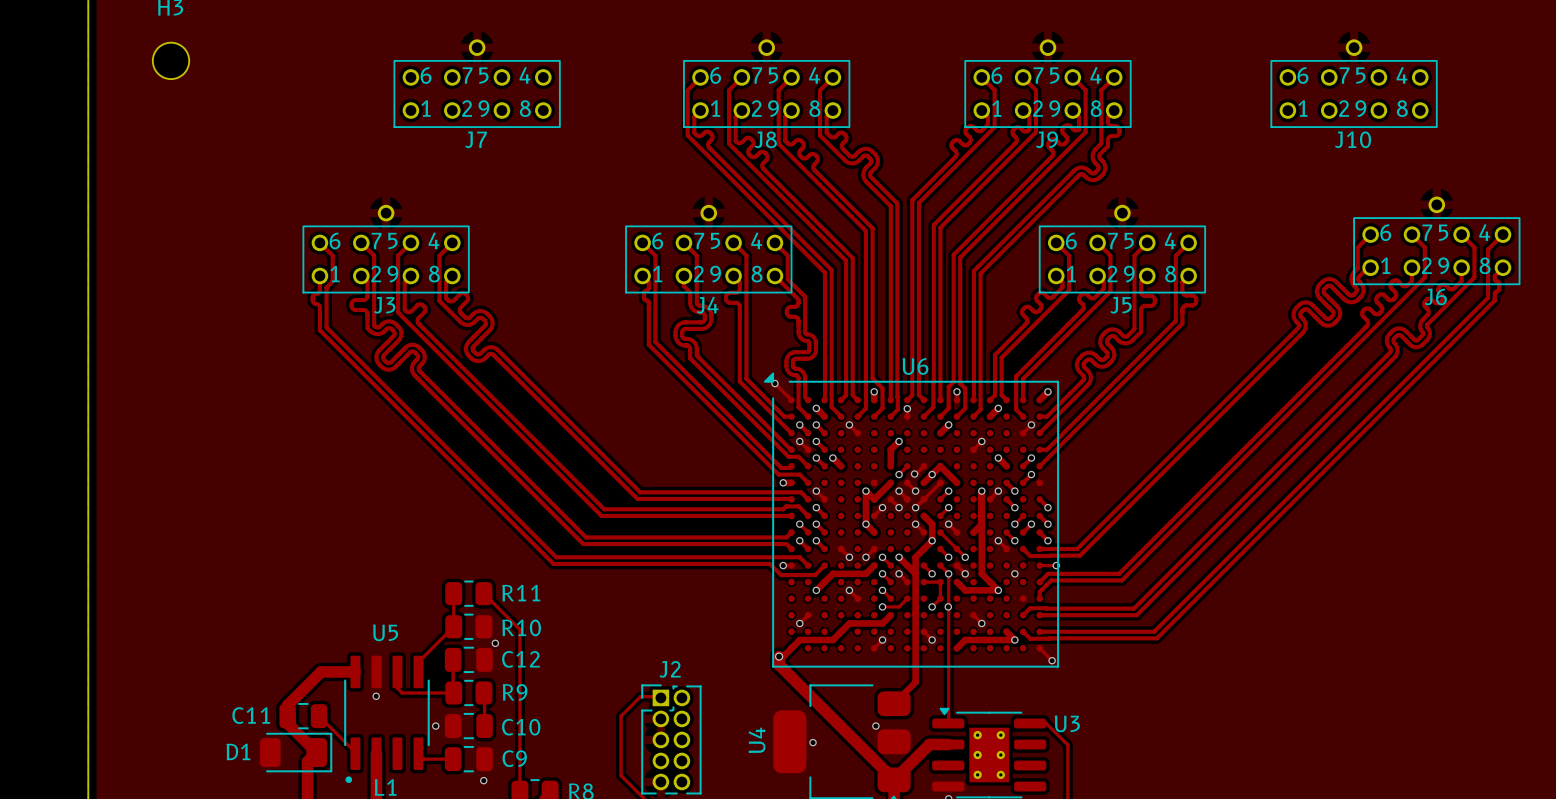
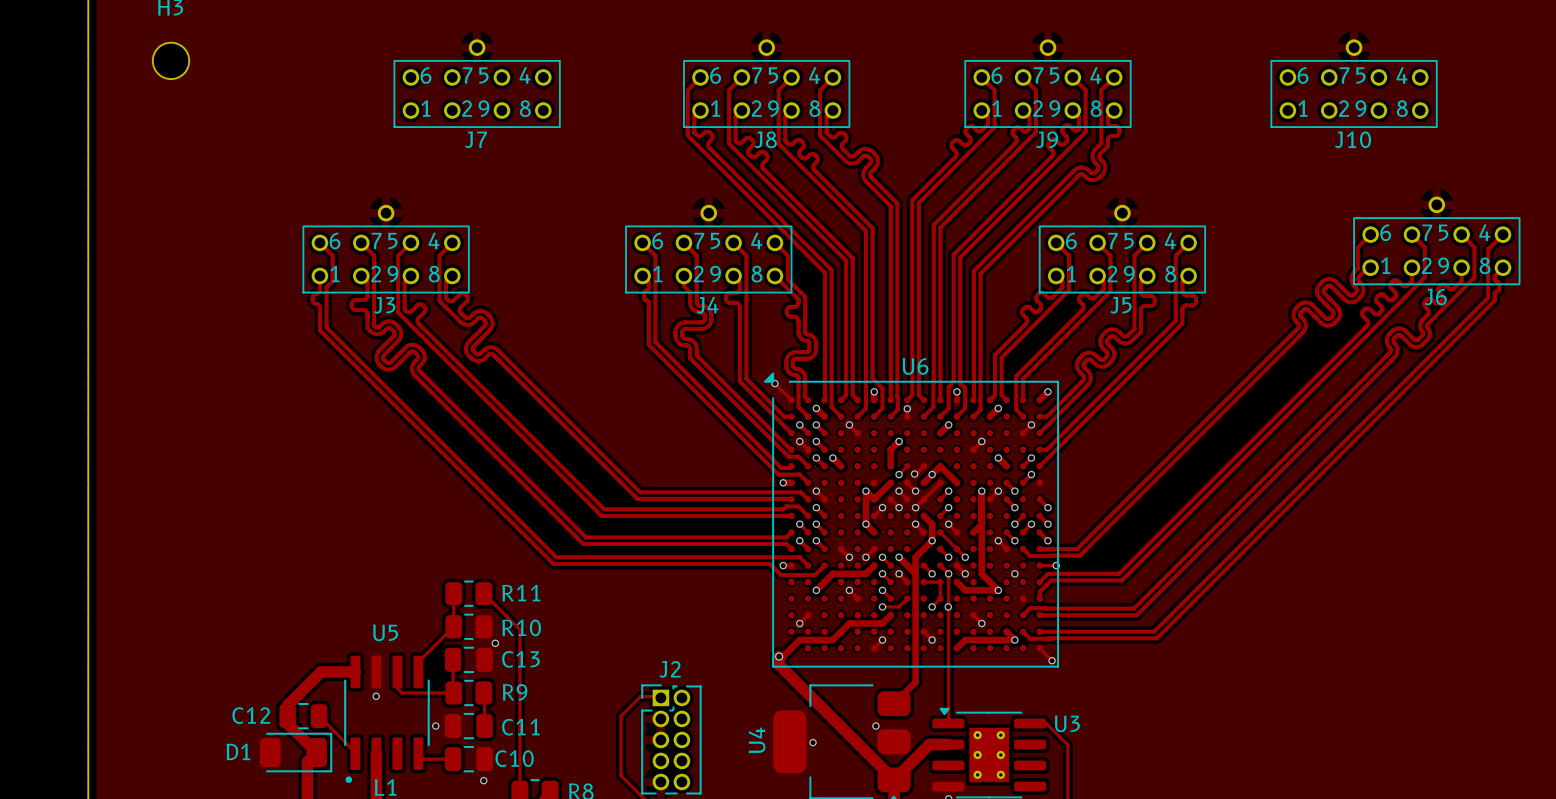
C12 name: C12 (520, 659) -> C13 (520, 659)
C11 name: C11 (251, 715) -> C12 (251, 715)
C10 name: C10 (521, 727) -> C11 (520, 727)
C9 name: C9 (514, 758) -> C10 (514, 758)

